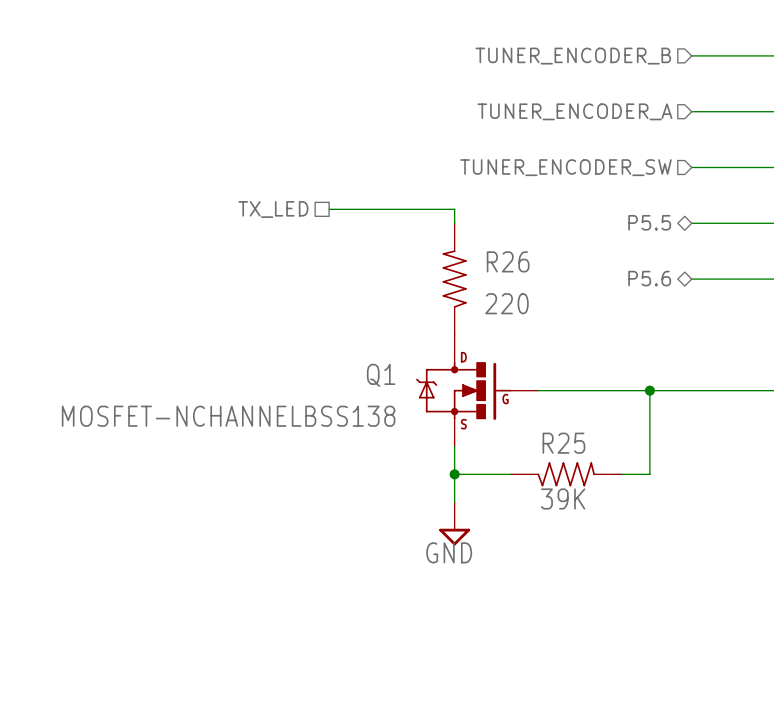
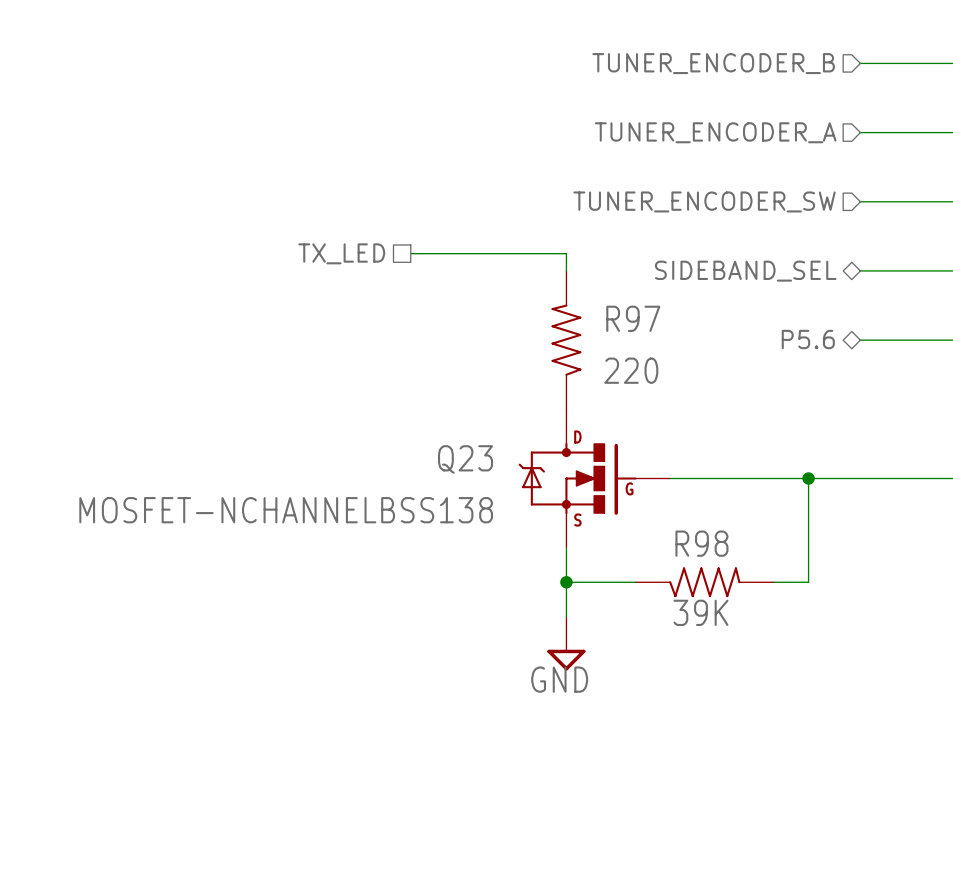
hierarchical label: P5.5 (649, 222) -> SIDEBAND_SEL (745, 271)
R26 name: R26 (508, 261) -> R97 (633, 318)
Q1 name: Q1 (381, 375) -> Q23 (465, 459)
R25 name: R25 (563, 443) -> R98 (701, 543)

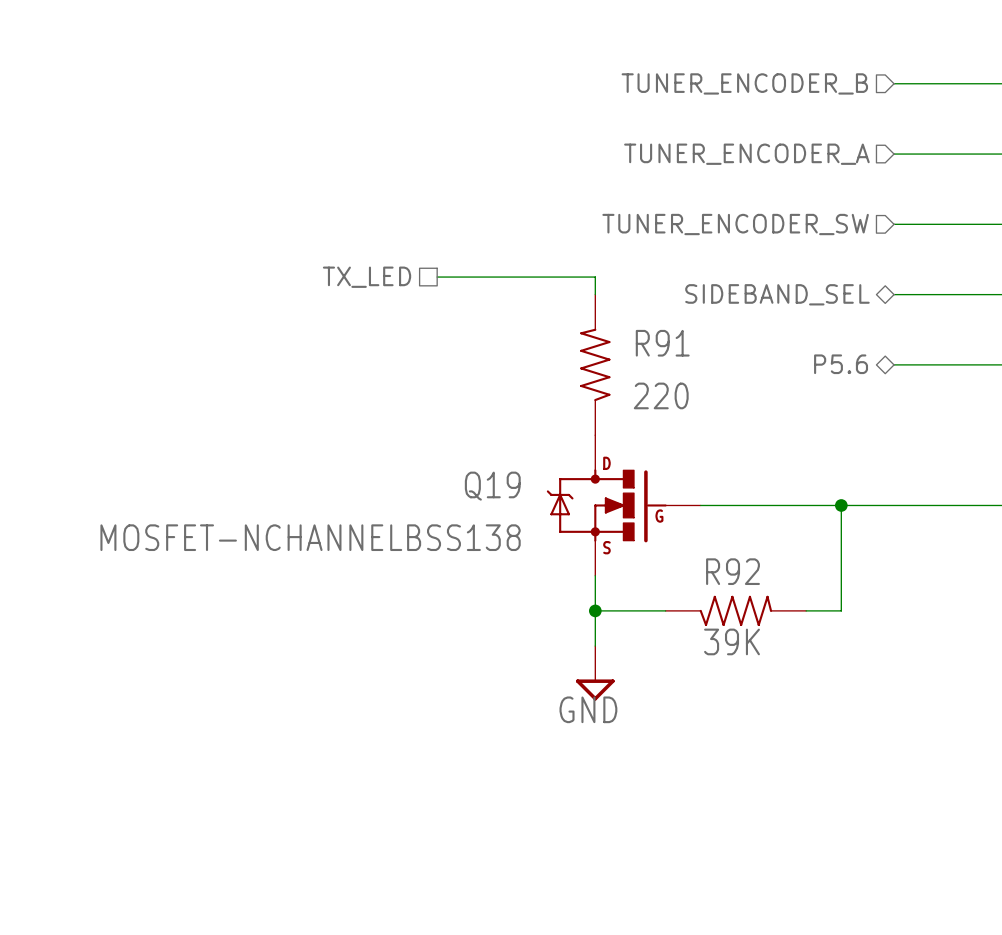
R97 name: R97 (633, 318) -> R91 (662, 343)
Q23 name: Q23 (465, 459) -> Q19 (492, 486)
R98 name: R98 (701, 543) -> R92 (733, 571)

